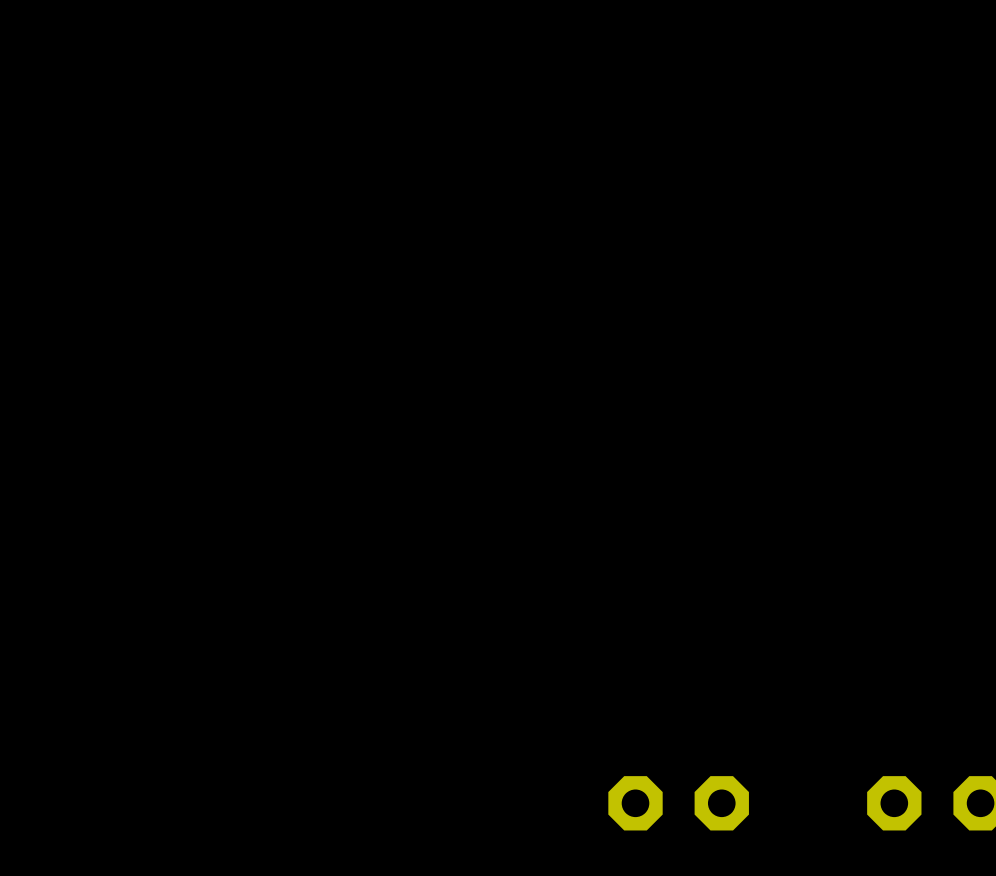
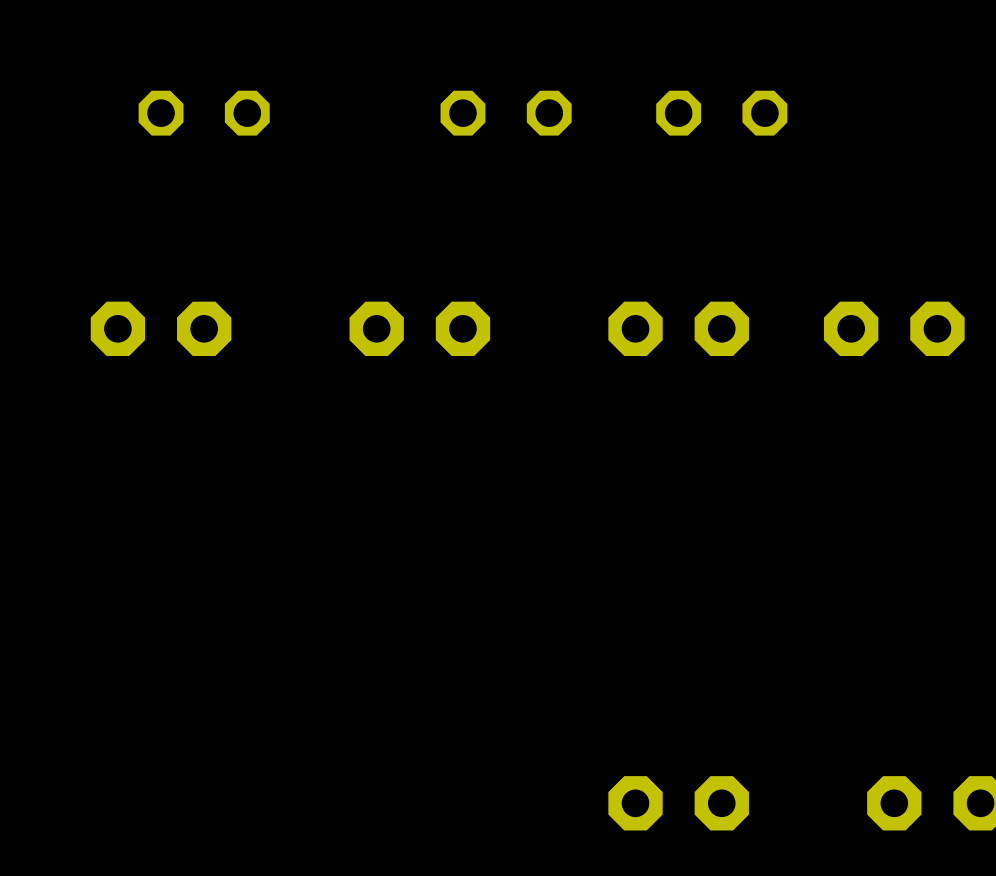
part: none -> (204, 113)
part: none -> (506, 113)
part: none -> (721, 113)
part: none -> (161, 328)
part: none -> (419, 328)
part: none -> (678, 328)
part: none -> (894, 328)

